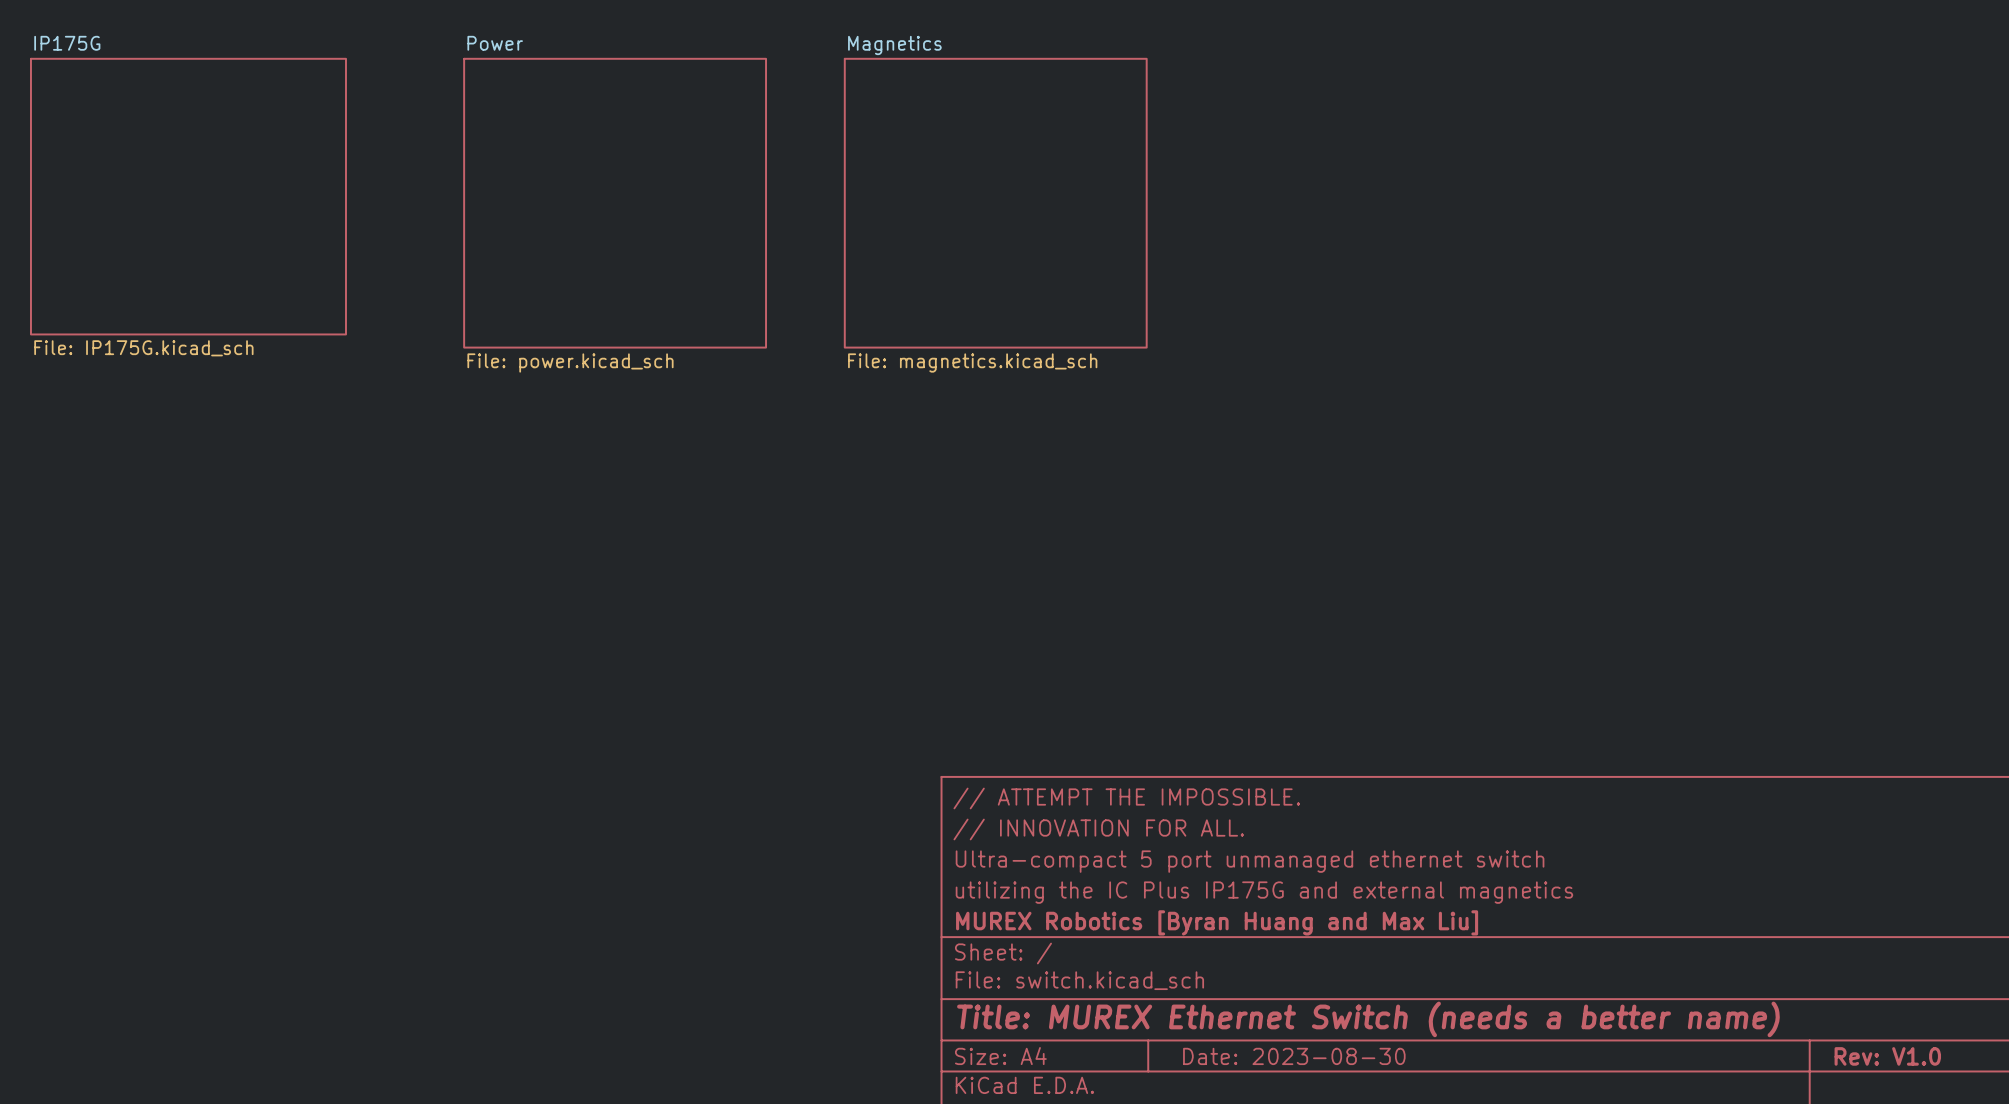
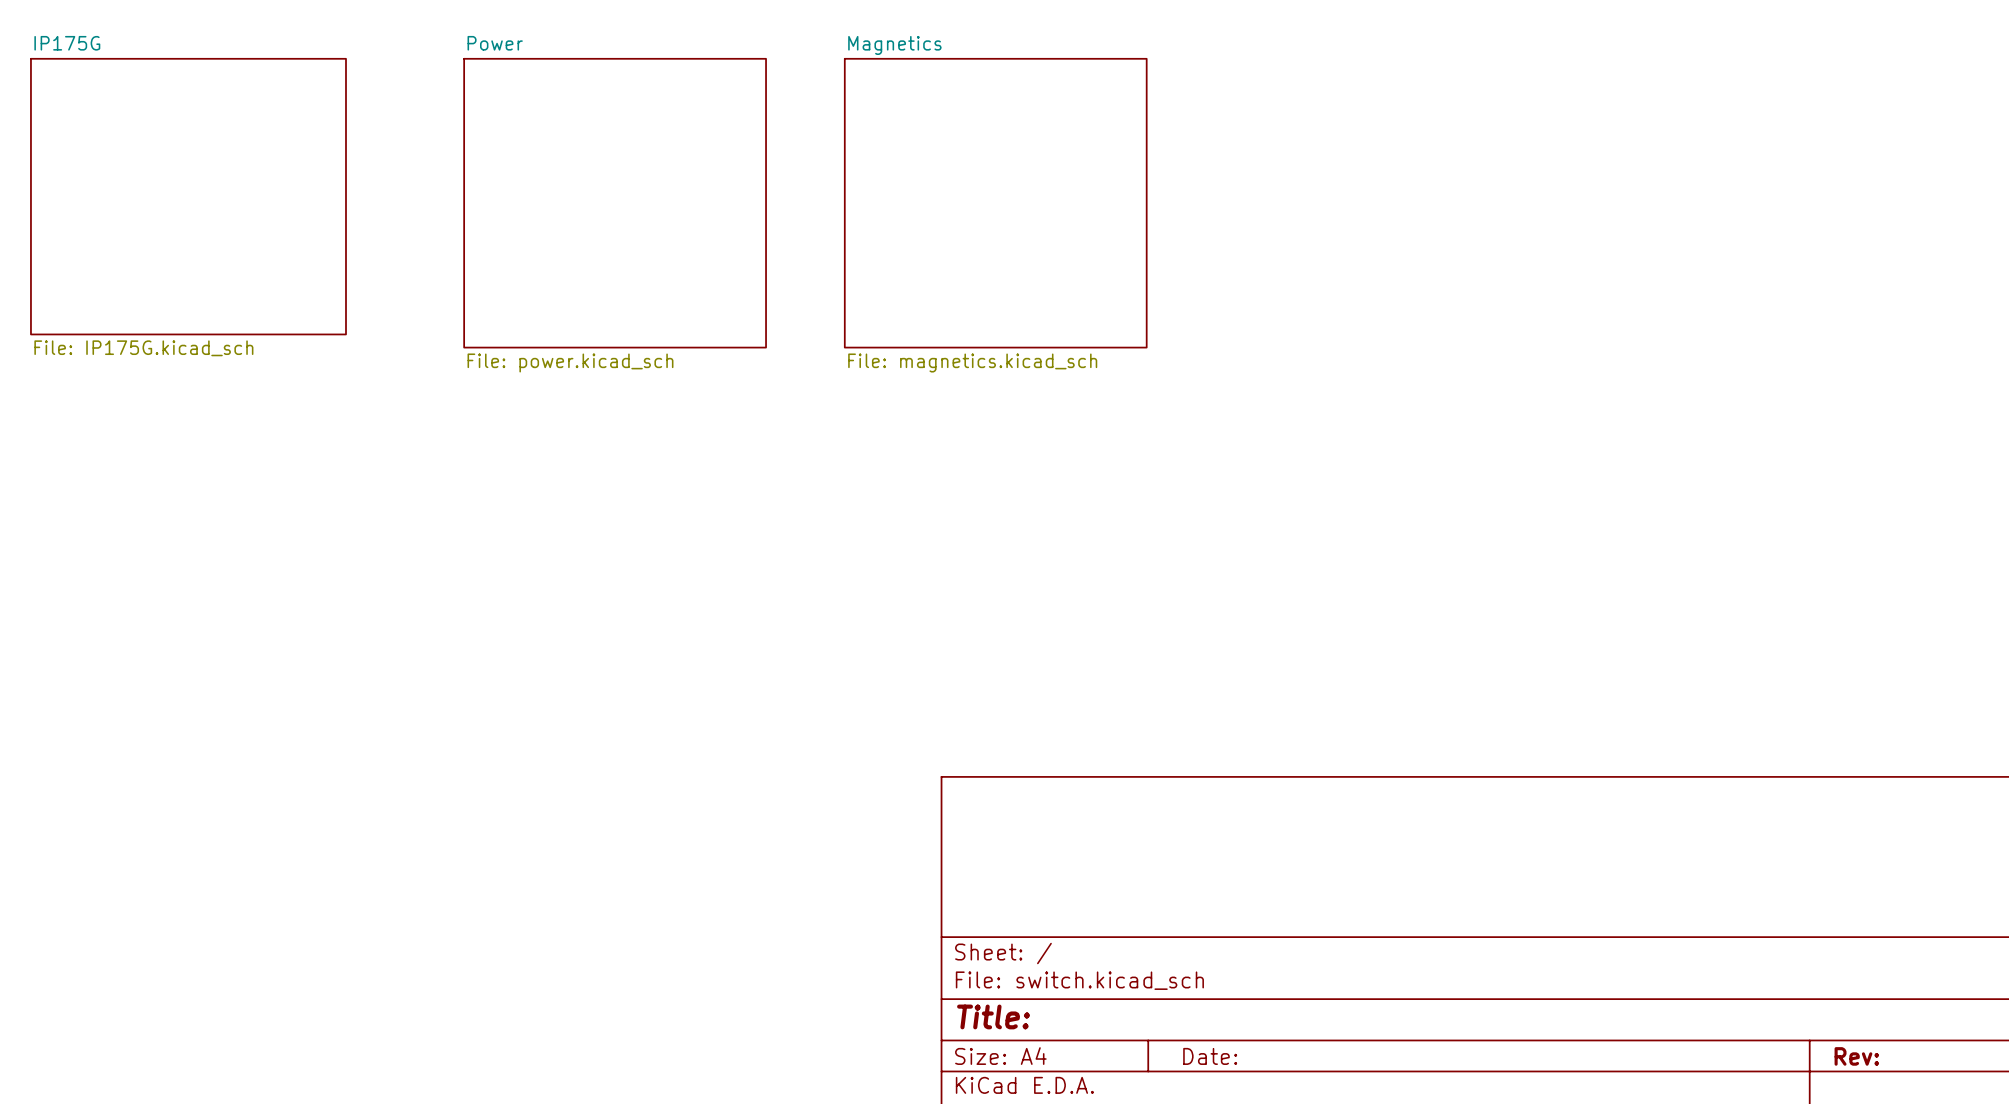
title block: // ATTEMPT THE IMPOSSIBLE. (1126, 798) -> none
title block: // INNOVATION FOR ALL. (1098, 829) -> none
title block: Ultra-compact 5 port unmanaged ethernet switch (1250, 861) -> none
title block: utilizing the IC Plus IP175G and external magnetics (1264, 892) -> none
title block: MUREX Robotics [Byran Huang and Max Liu] (1217, 922) -> none
title block: Title: MUREX Ethernet Switch (needs a better name) (1368, 1019) -> Title: (993, 1016)
title block: Date: 2023-08-30 (1294, 1056) -> Date: (1210, 1056)
title block: Rev: V1.0 (1887, 1056) -> Rev: (1856, 1056)

